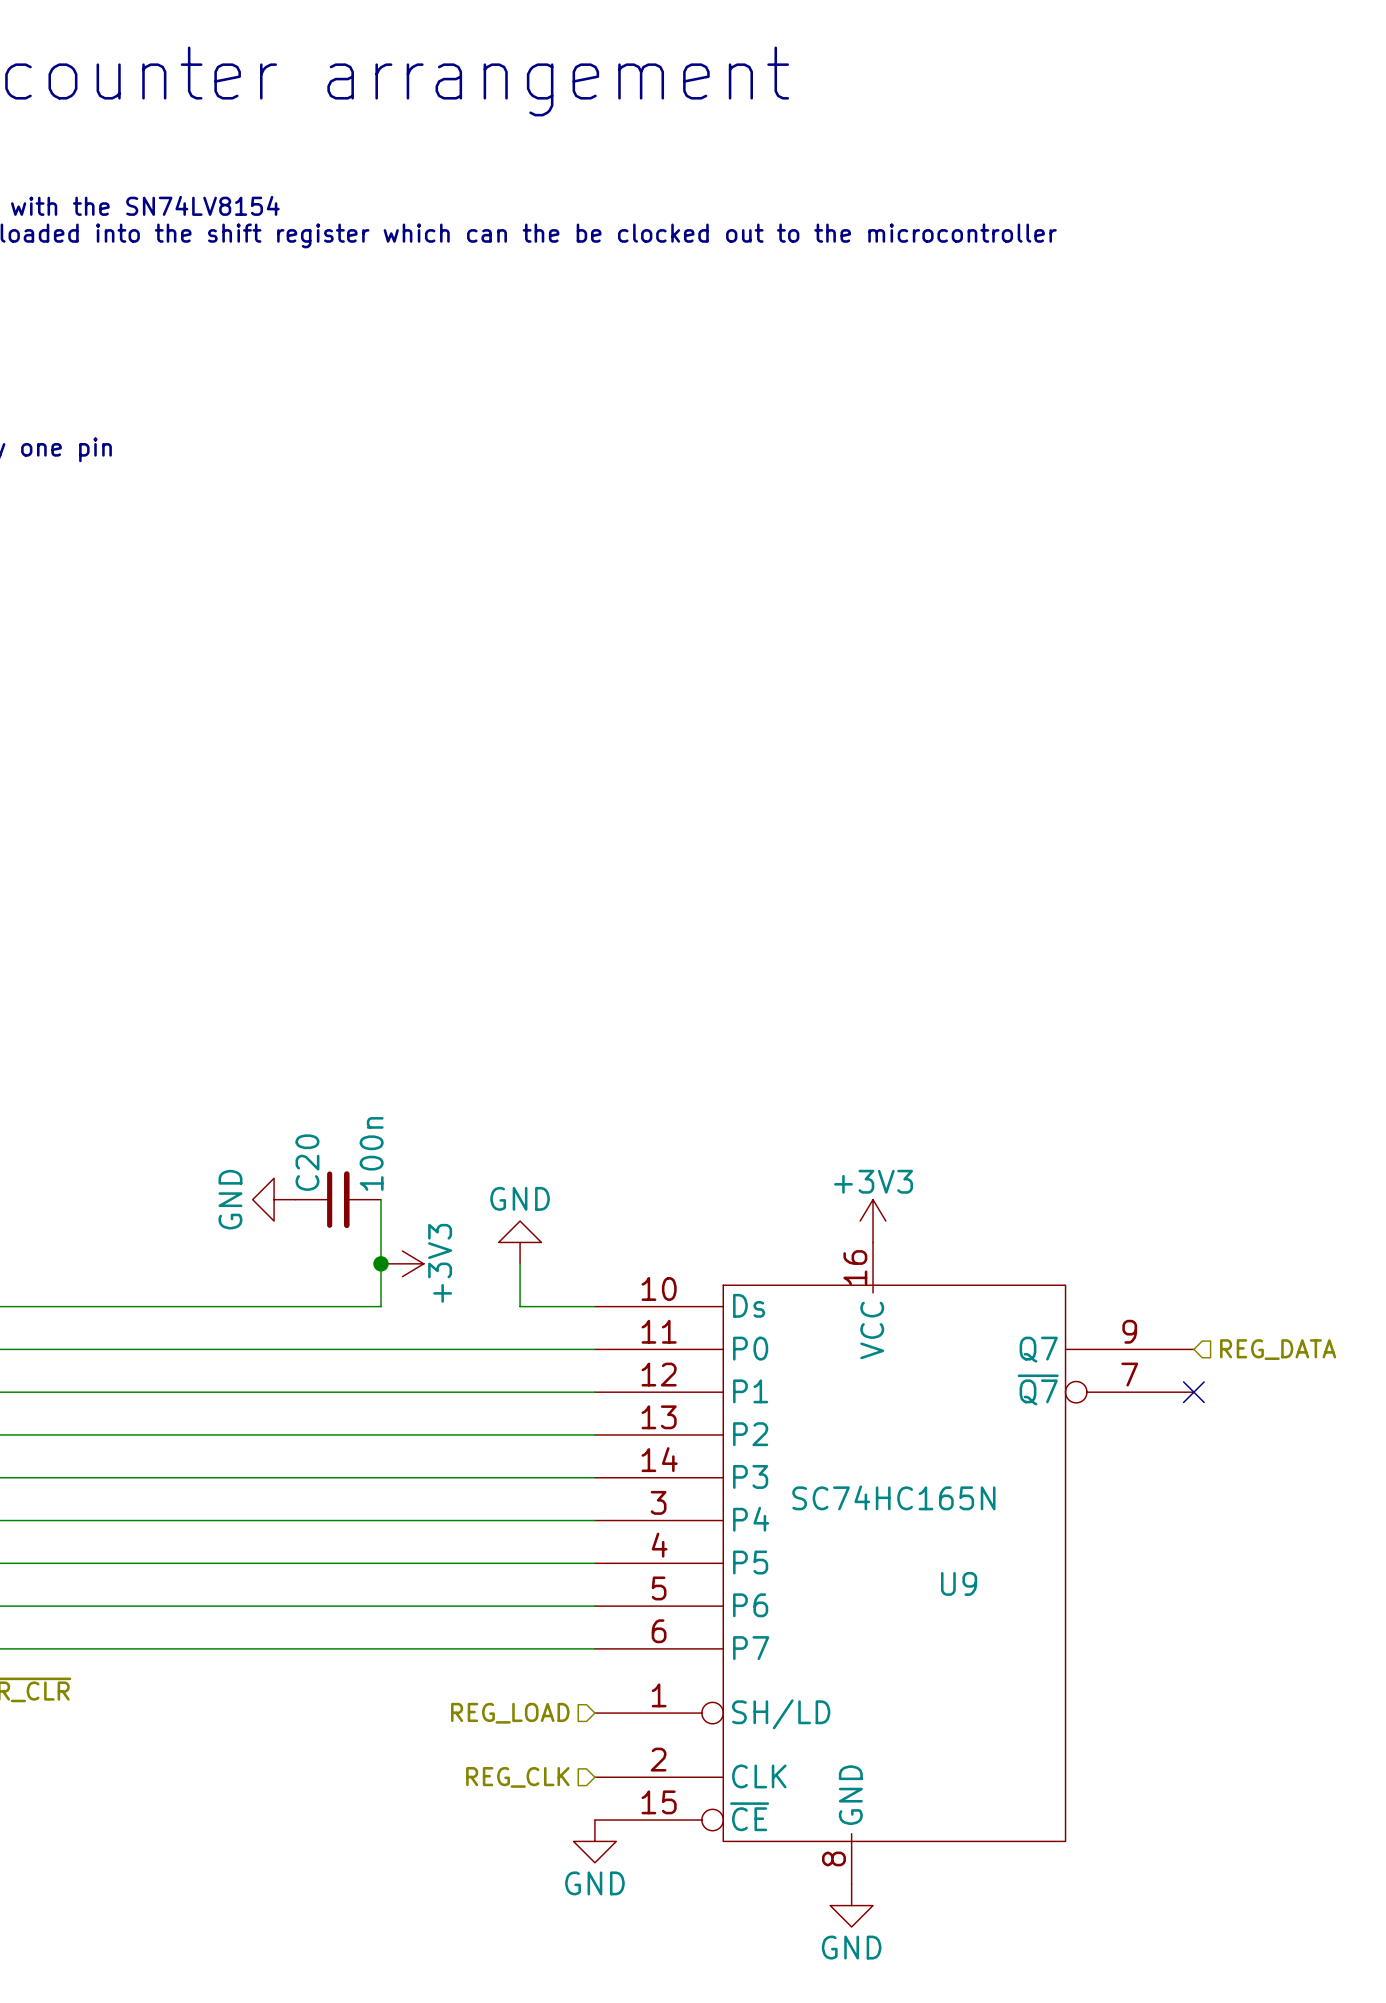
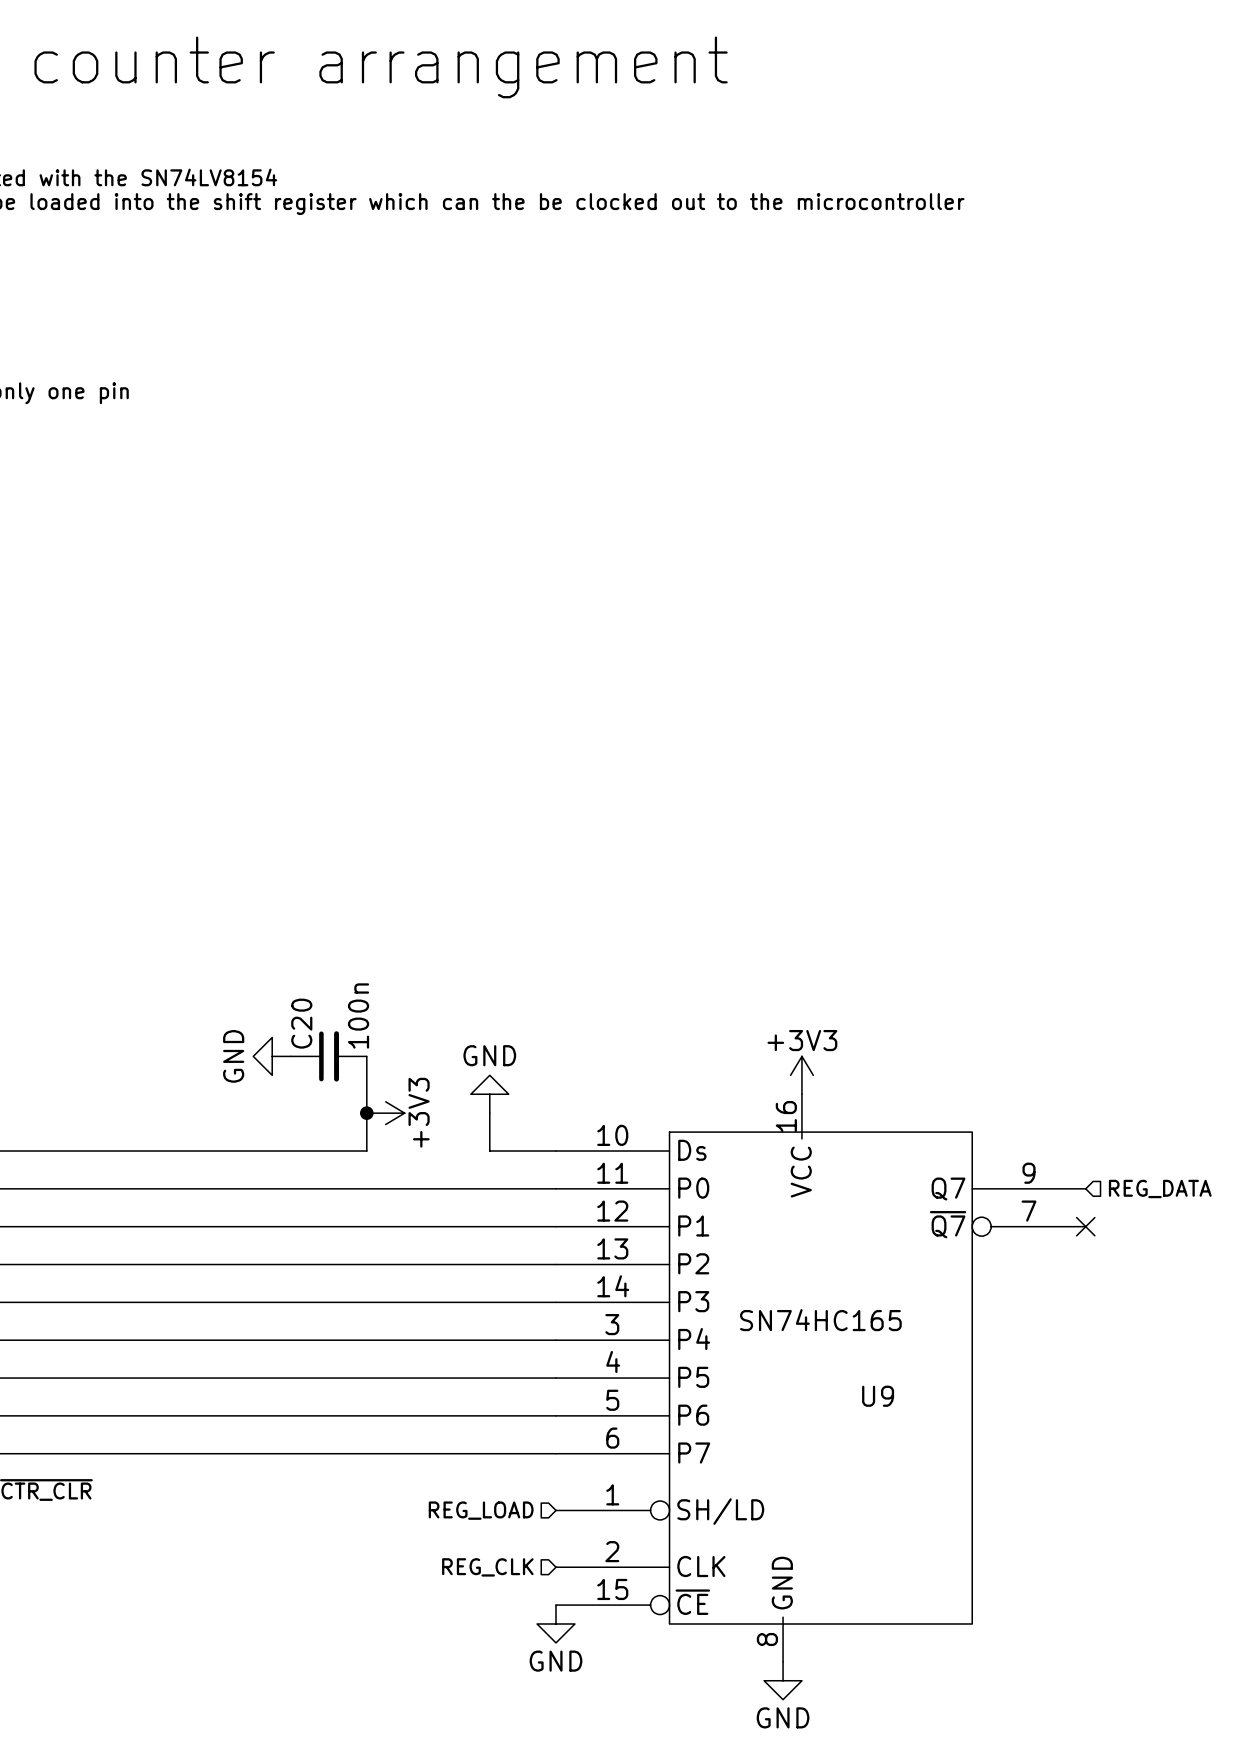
U9 value: SC74HC165N (893, 1497) -> SN74HC165 (820, 1320)

